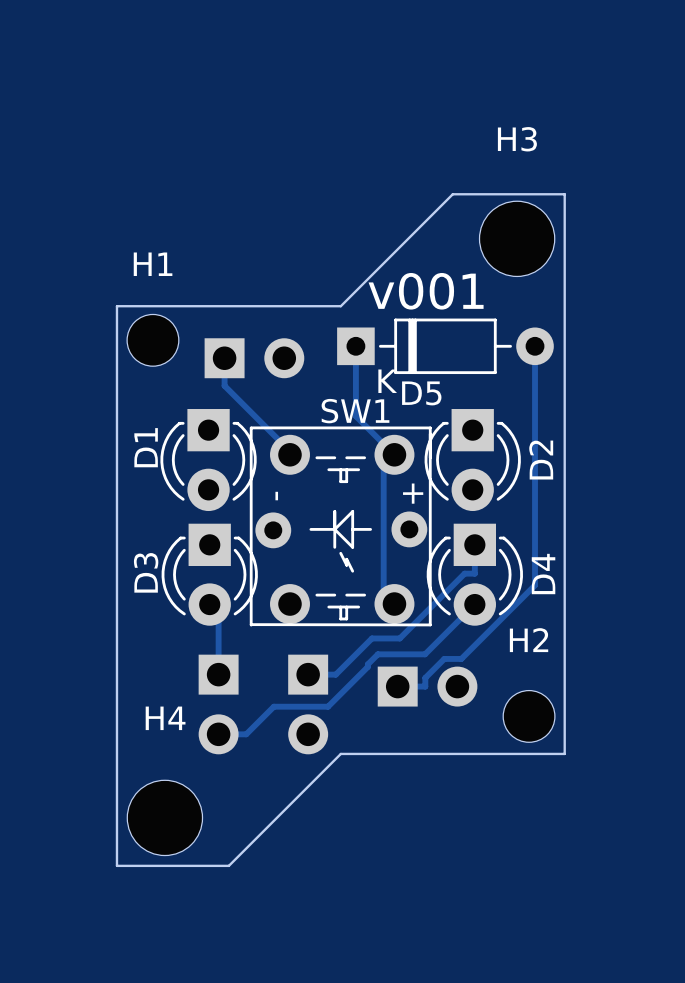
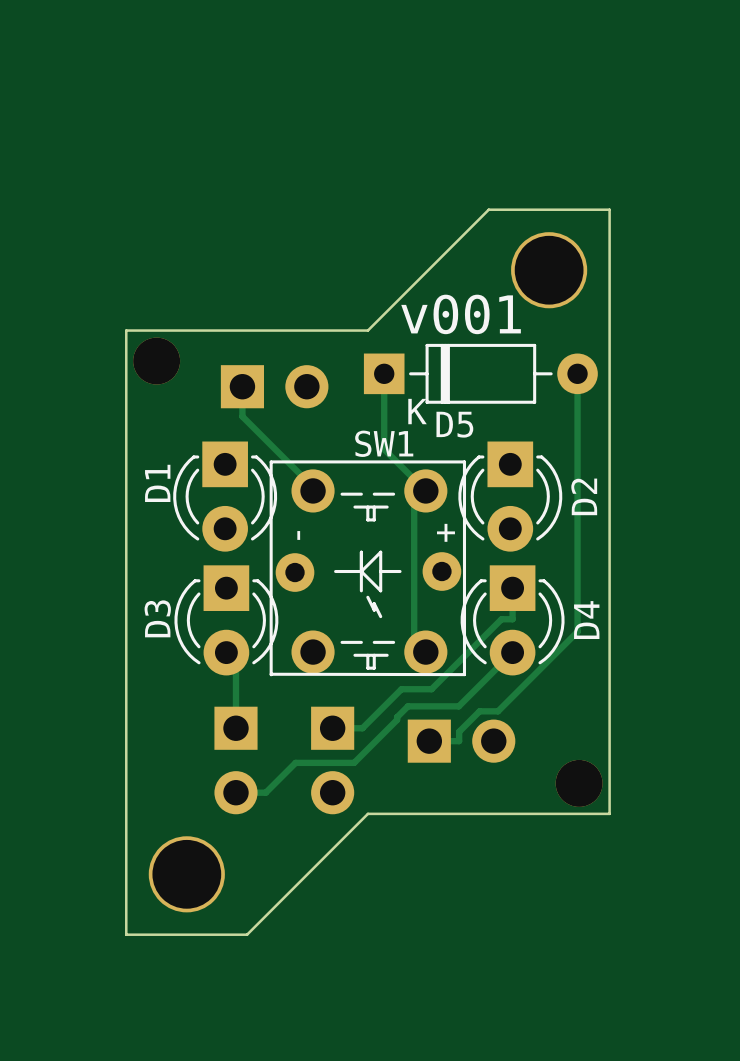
H3: (517, 238) -> none
part: none -> (549, 270)
part: none -> (156, 361)
H1: (152, 340) -> none
H2: (529, 716) -> none
part: none -> (579, 783)
part: none -> (186, 874)
H4: (164, 817) -> none

